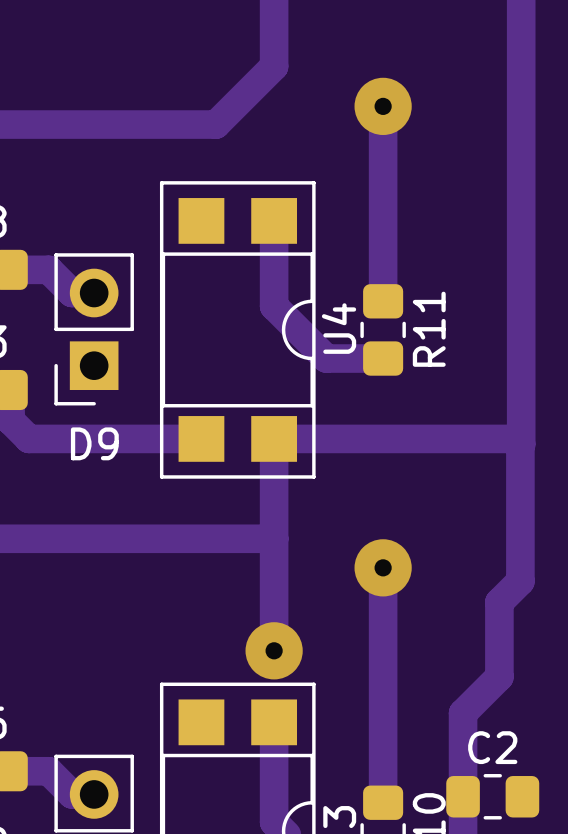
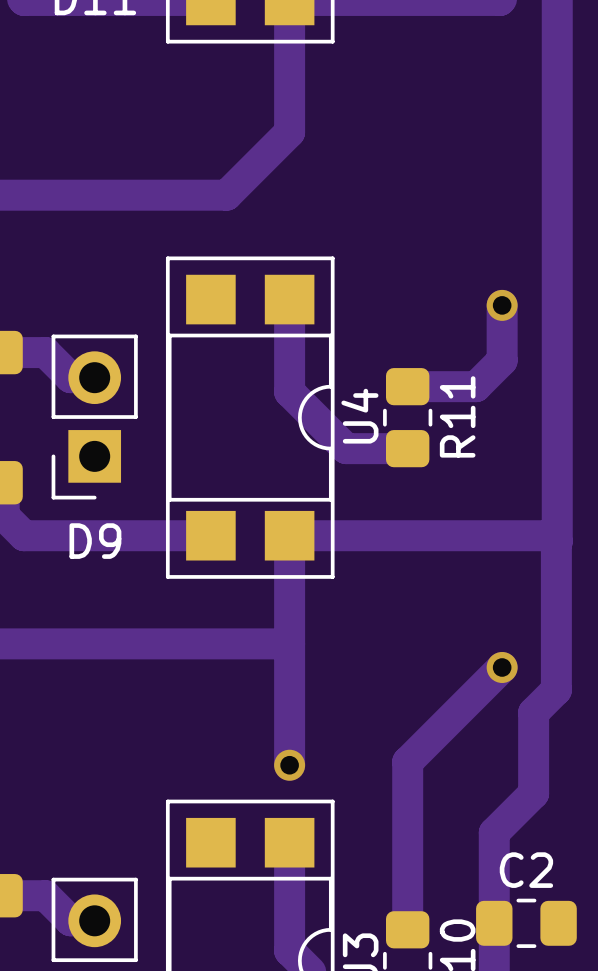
track: (383, 106) (383, 301) -> (502, 305) (502, 360) (475, 386) (407, 386)
via: (383, 106) -> none
via: none -> (502, 305)
via: none -> (502, 667)
track: (383, 567) (383, 647) -> (502, 667) (407, 761)
via: (383, 567) -> none
via size: [245, 622, 303, 680] -> [274, 749, 306, 781]

